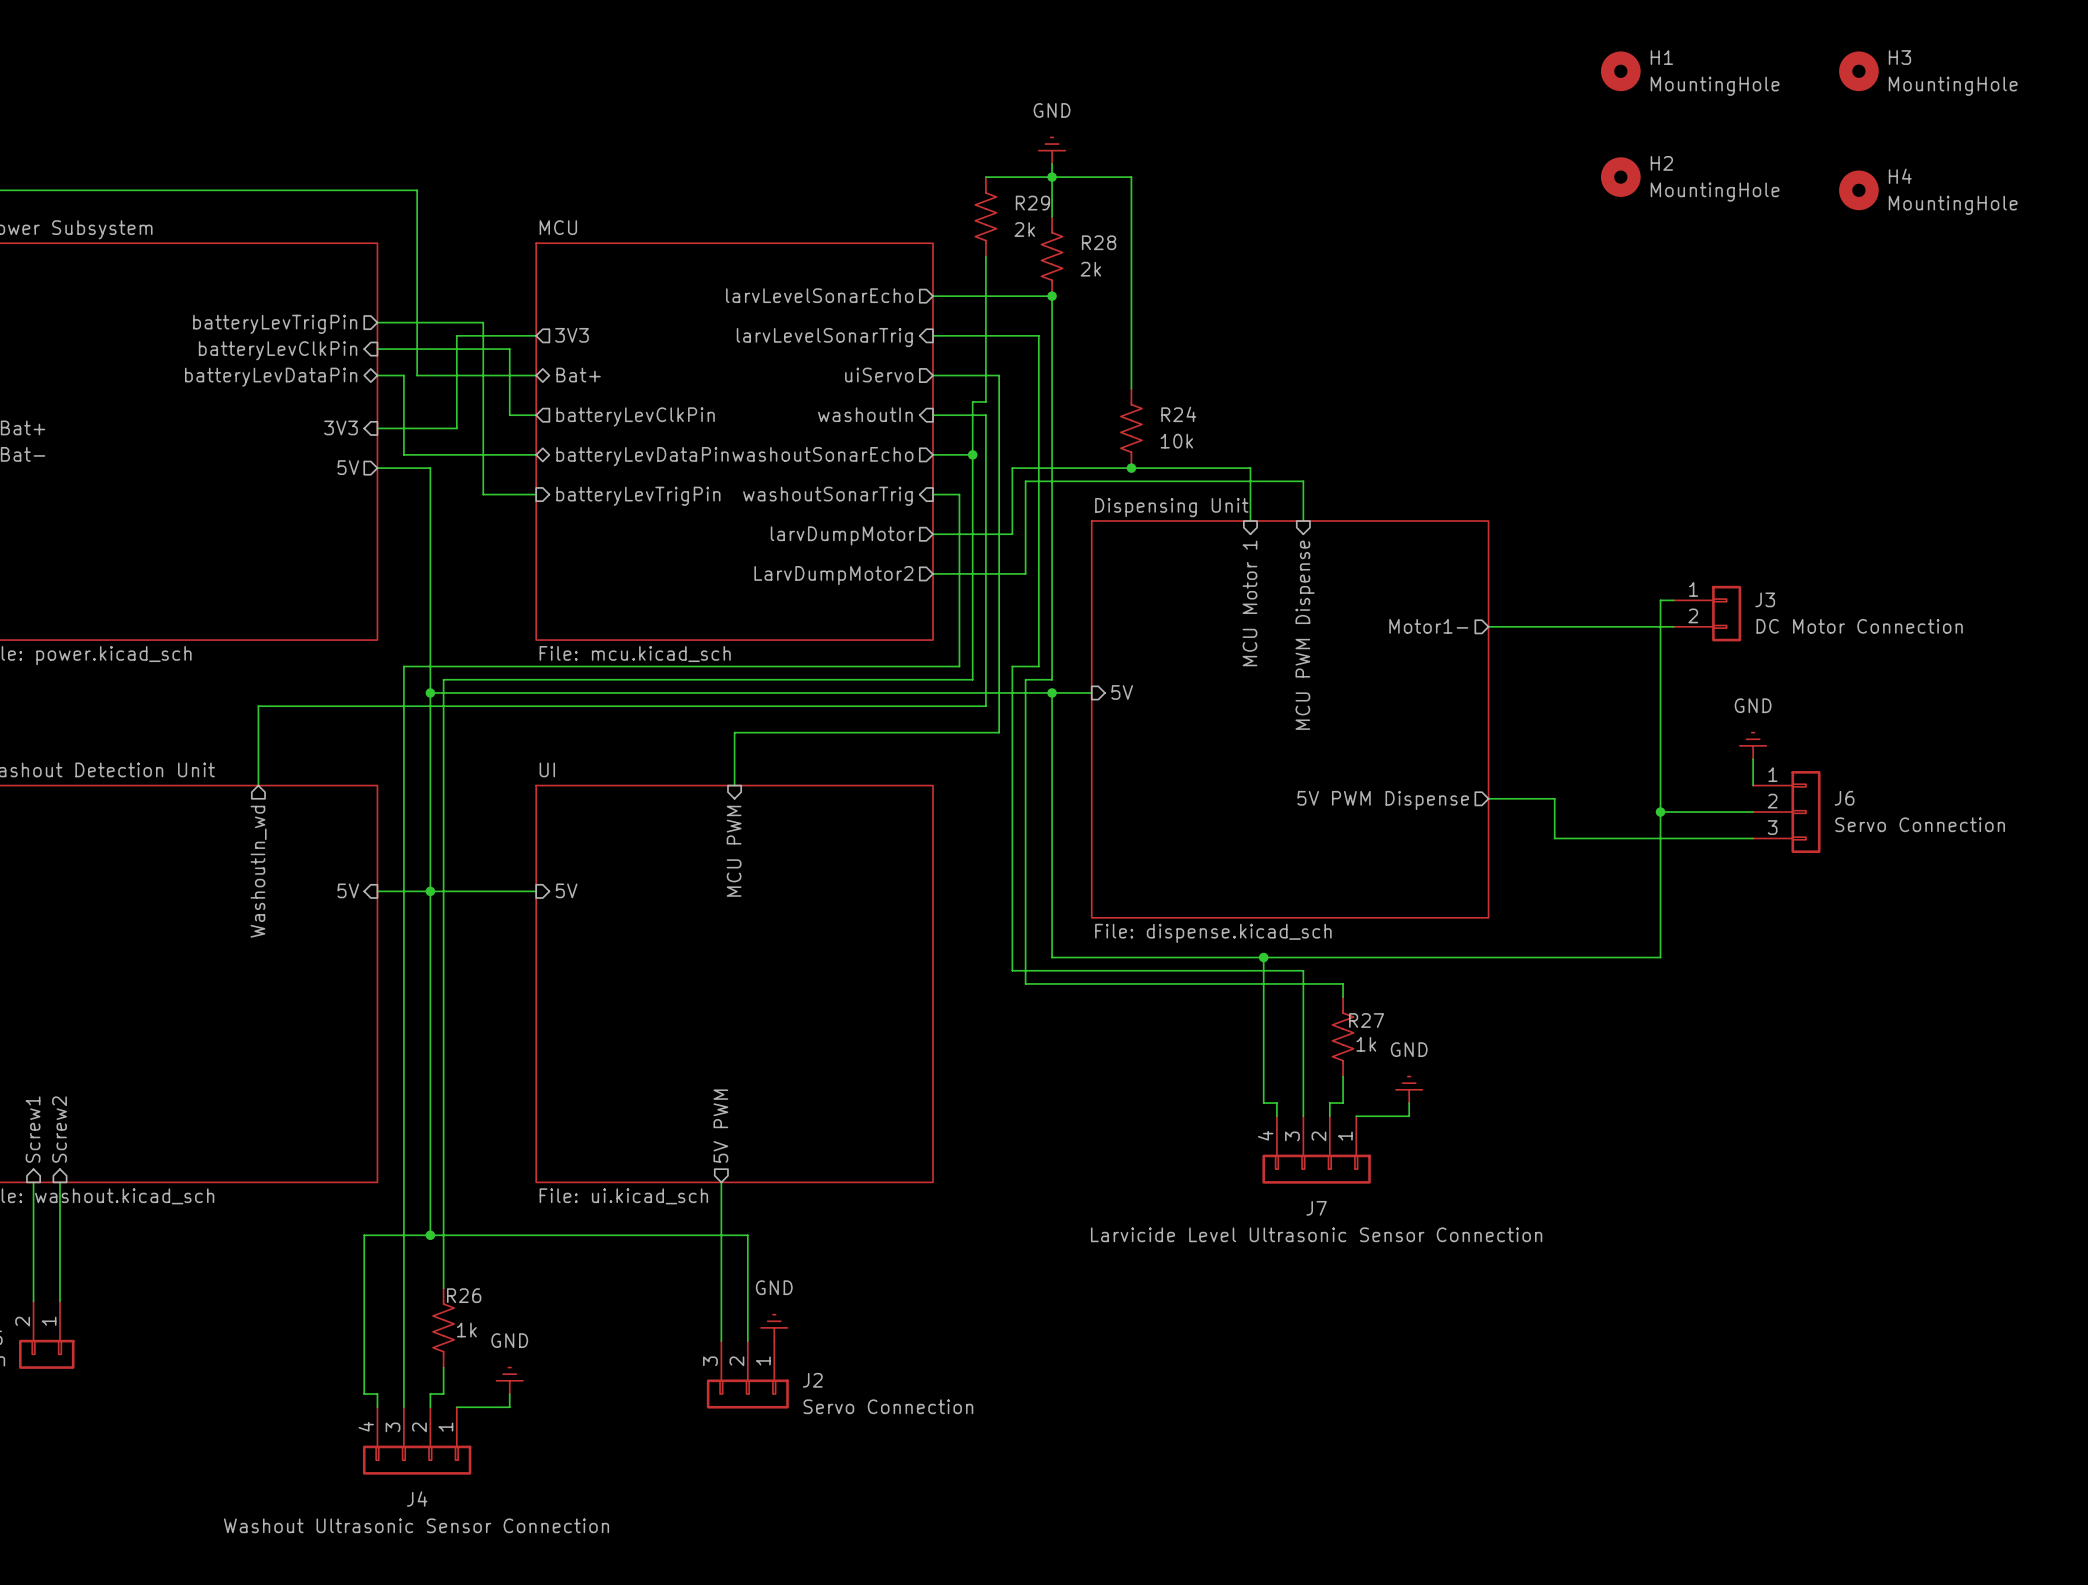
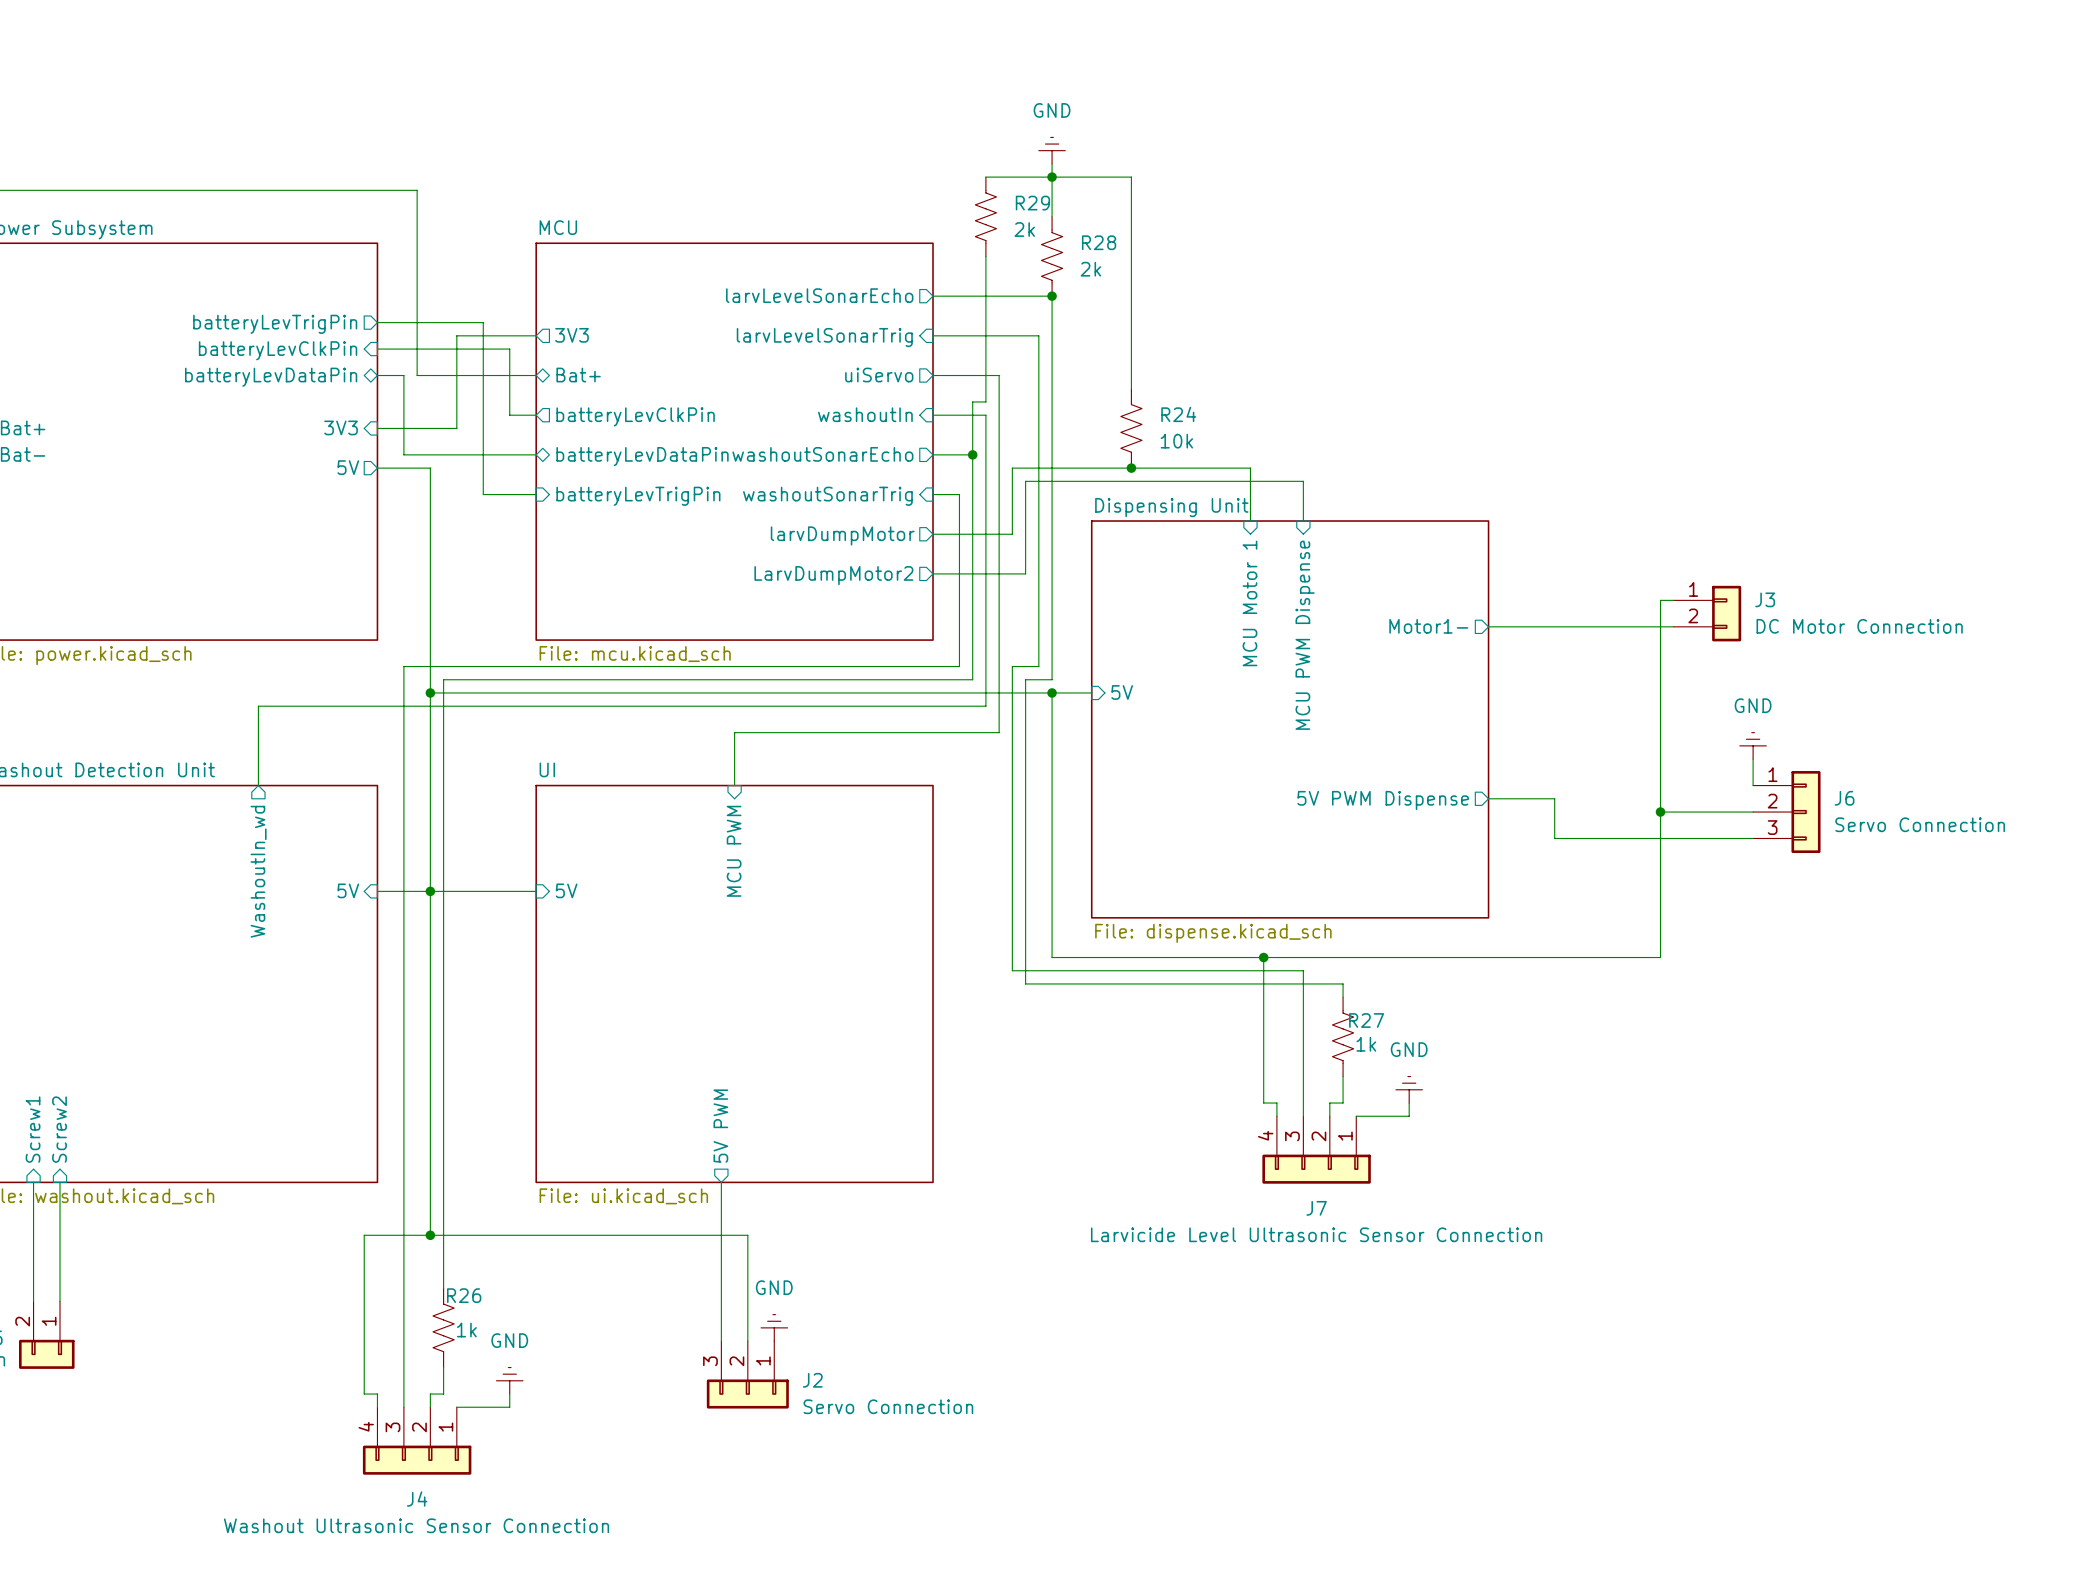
H1: MountingHole (1620, 71) -> none
H3: MountingHole (1858, 71) -> none
H2: MountingHole (1620, 177) -> none
H4: MountingHole (1858, 190) -> none

